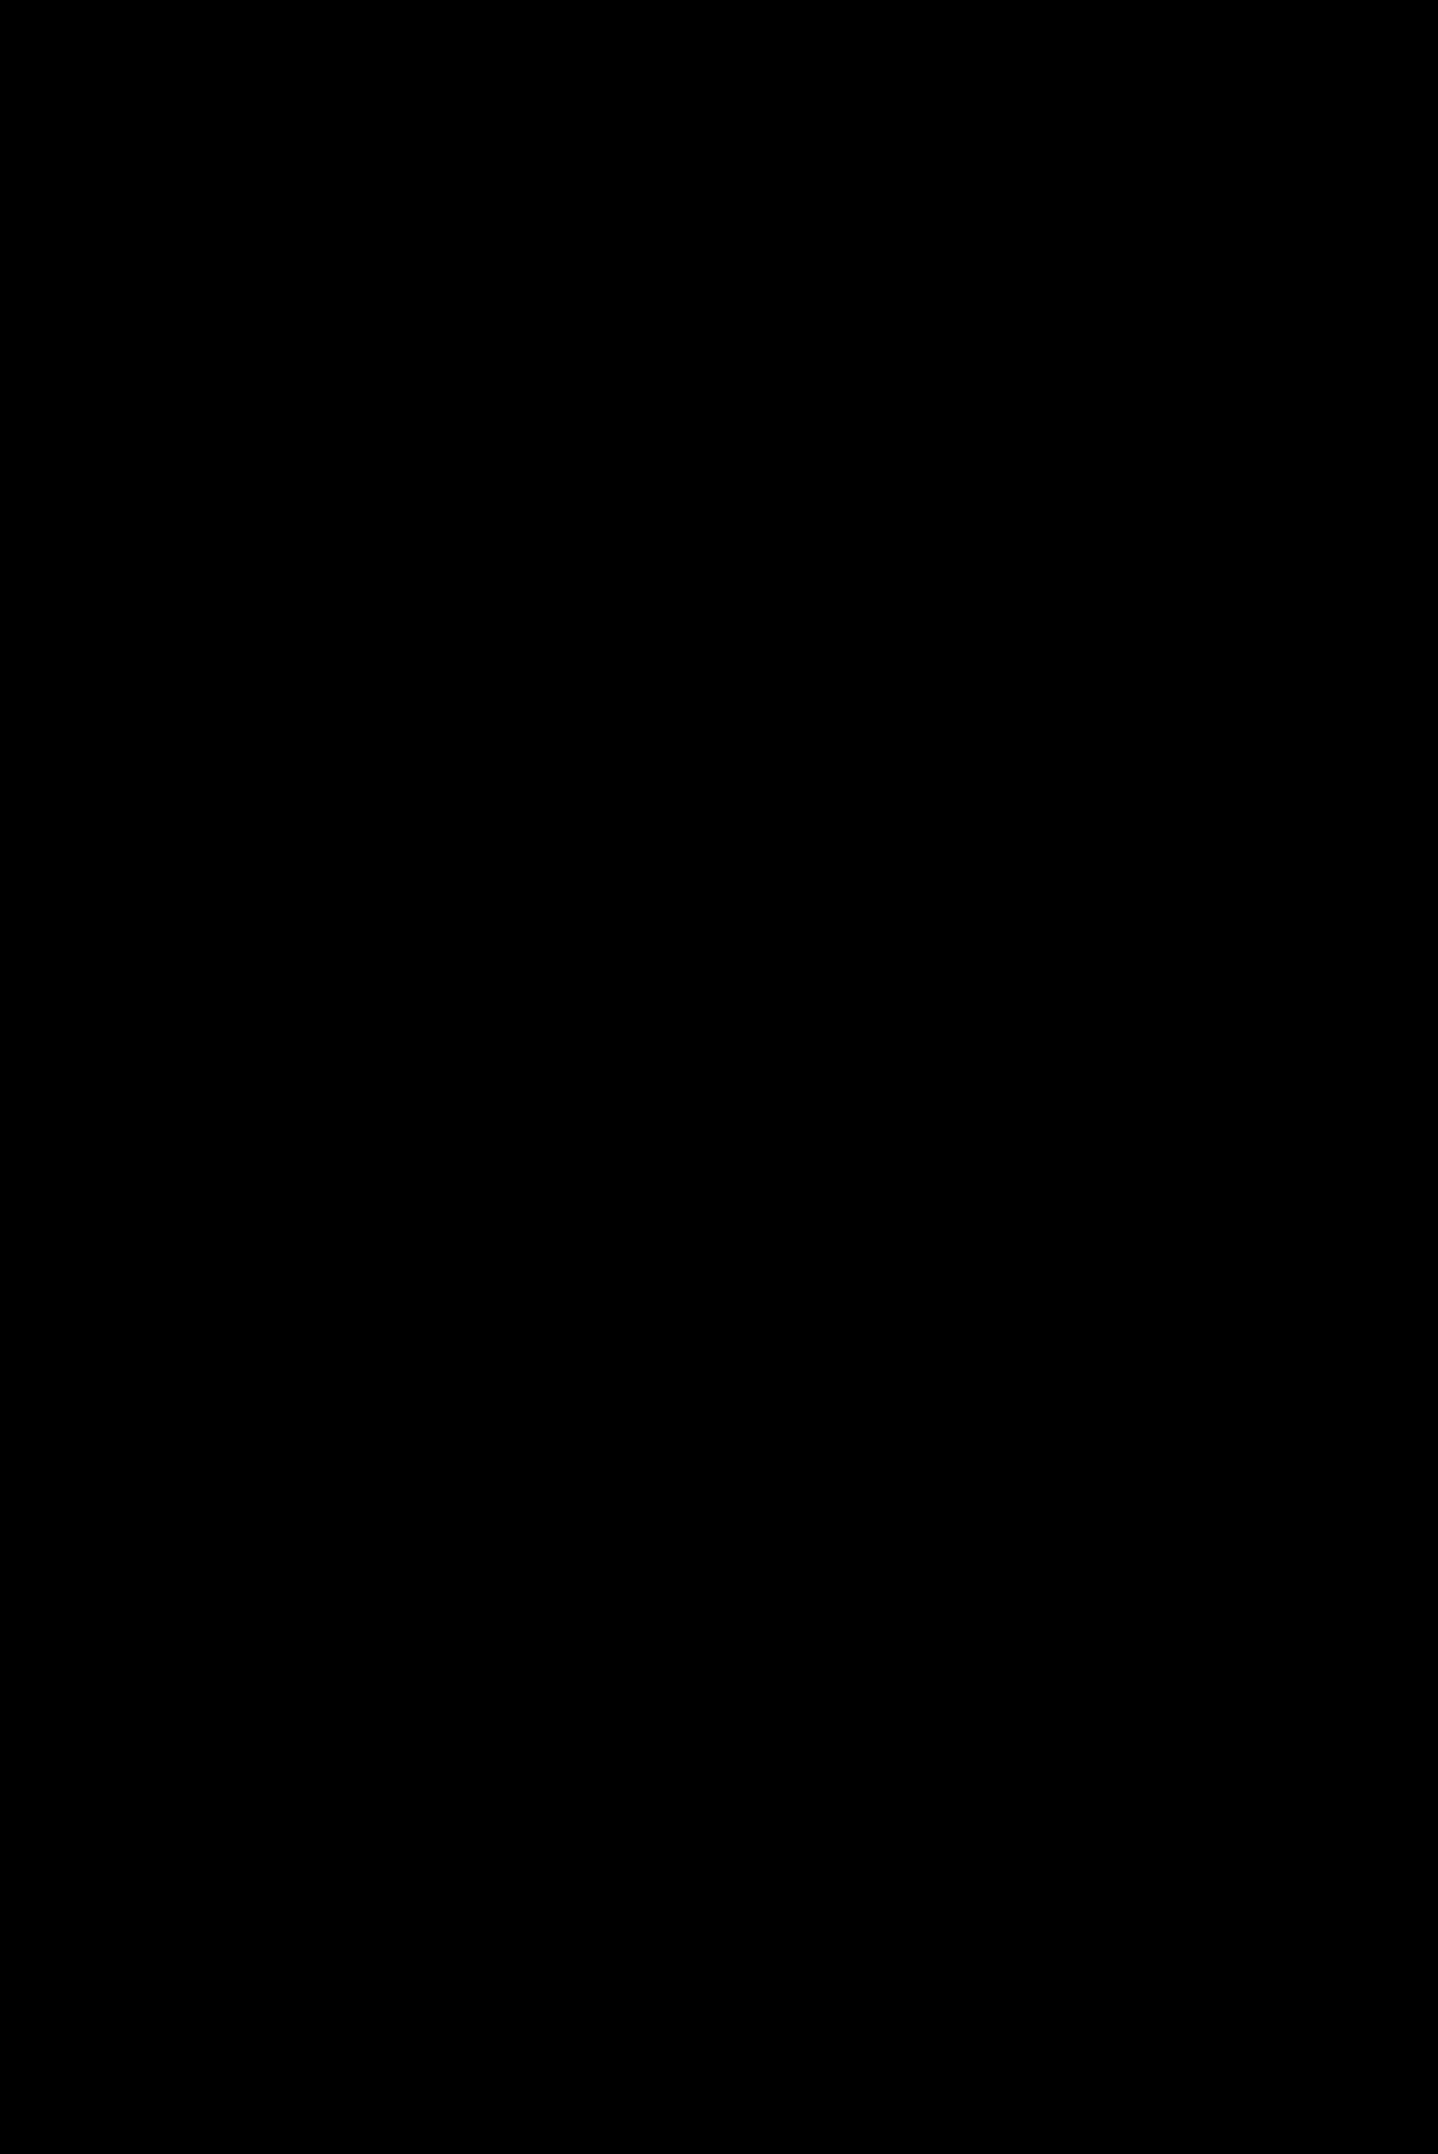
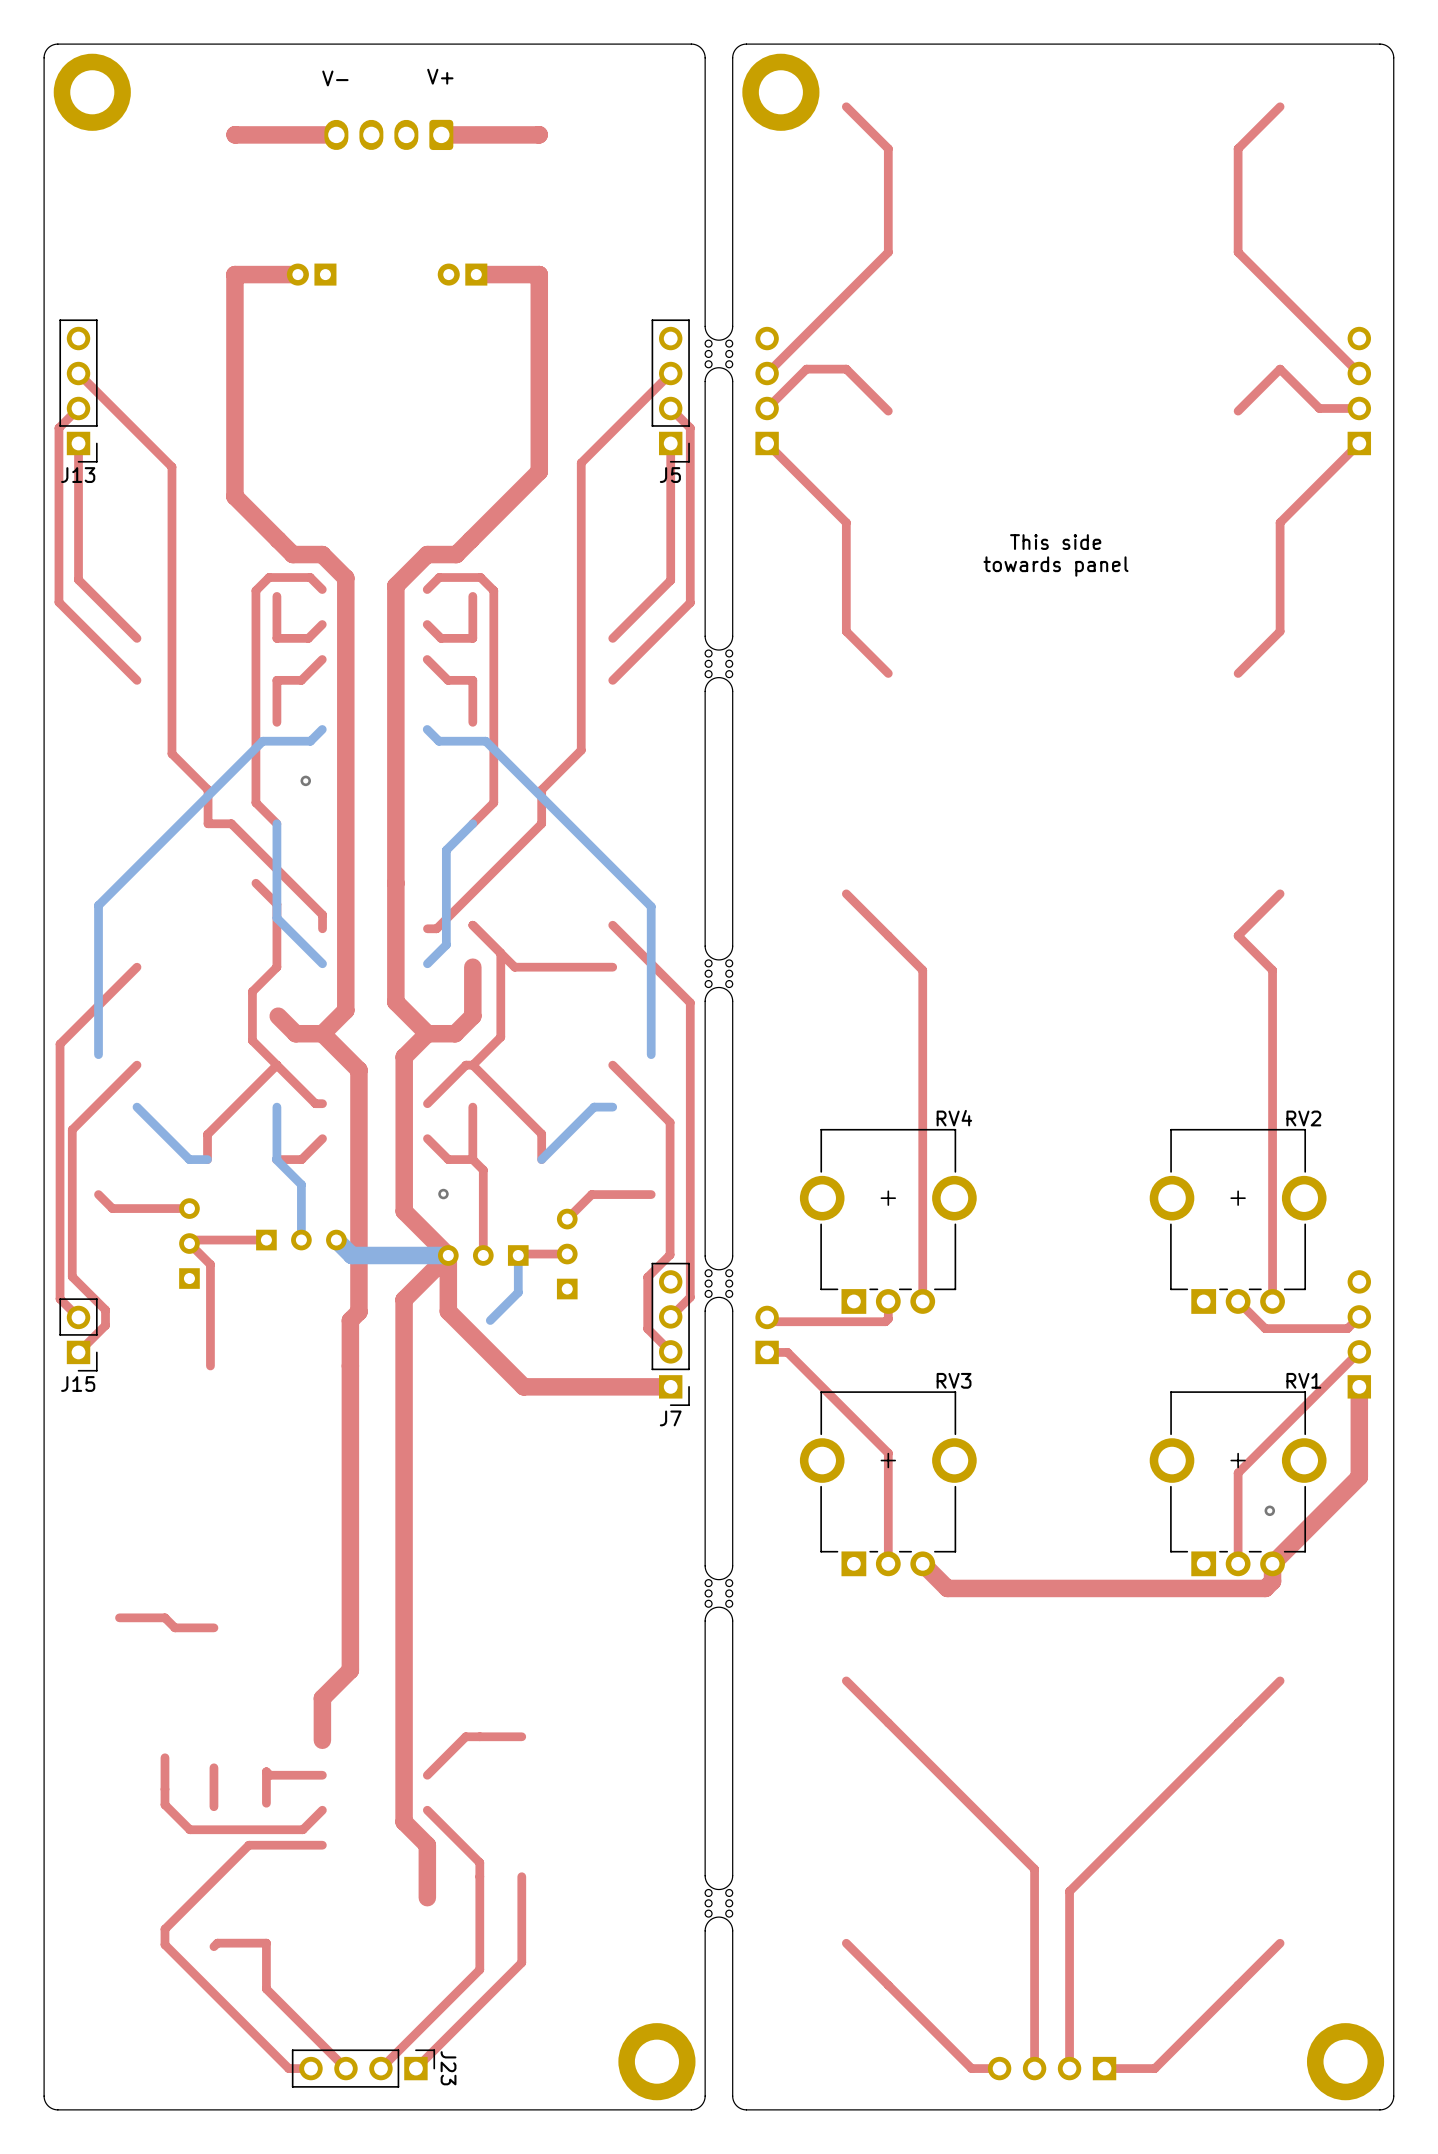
board edge: none -> (1379, 44) (740, 45) (734, 50) (732, 57) (732, 328) (728, 336) (718, 340) (709, 336) (705, 328) (705, 57) (703, 50) (697, 45) (57, 44) (51, 45) (46, 50) (44, 57) (44, 2096) (46, 2103) (50, 2107) (57, 2109) (694, 2109) (702, 2104) (705, 2097) (705, 1929) (710, 1919) (718, 1917) (727, 1919) (732, 1929) (732, 2097) (735, 2104) (743, 2109) (1379, 2109) (1385, 2108) (1391, 2103) (1393, 2096) (1393, 57) (1389, 48) (1379, 44)
part: none -> (92, 92)
part: none -> (780, 92)
top track: none -> (846, 106) (888, 148) (888, 252) (767, 373)
top track: none -> (1280, 106) (1238, 148) (1238, 252) (1359, 373)
top track: none -> (234, 134) (336, 134)
part: none -> (388, 134)
top track: none -> (539, 134) (441, 134)
top track: none -> (297, 274) (234, 274) (234, 496) (292, 554) (322, 554) (345, 578) (345, 1010) (322, 1033)
part: none -> (311, 274)
part: none -> (462, 274)
top track: none -> (476, 274) (539, 274) (539, 471) (456, 554) (427, 554) (395, 585) (395, 1002) (427, 1033)
part: none -> (718, 353)
top track: none -> (78, 373) (171, 466) (171, 753) (208, 789) (208, 823) (231, 823) (322, 914) (322, 928)
top track: none -> (670, 373) (581, 462) (581, 750) (541, 789) (541, 823) (436, 928) (427, 928)
board edge: none -> (732, 381) (732, 636) (728, 646) (718, 650) (709, 646) (705, 636) (705, 381) (709, 371) (718, 367) (728, 371) (732, 381)
J13: none -> (78, 391)
J5: none -> (670, 391)
part: none -> (767, 391)
part: none -> (1359, 391)
top track: none -> (78, 408) (58, 428) (58, 602) (136, 680)
top track: none -> (670, 408) (690, 428) (690, 602) (612, 680)
top track: none -> (767, 408) (806, 369) (846, 369) (888, 411)
top track: none -> (1359, 408) (1319, 408) (1280, 369) (1238, 411)
top track: none -> (78, 443) (78, 579) (136, 638)
top track: none -> (670, 443) (670, 580) (612, 638)
top track: none -> (767, 443) (846, 522) (846, 631) (888, 673)
top track: none -> (1359, 443) (1280, 522) (1280, 631) (1238, 673)
text: none -> This side (1055, 542)
text: none -> towards panel (1056, 566)
top track: none -> (322, 589) (310, 577) (269, 577) (255, 590) (255, 802) (276, 823)
top track: none -> (427, 589) (439, 577) (480, 577) (493, 590) (493, 802) (472, 823)
top track: none -> (276, 596) (276, 638) (308, 638) (322, 624)
top track: none -> (472, 596) (472, 638) (441, 638) (427, 624)
top track: none -> (322, 659) (301, 680) (276, 680) (276, 722)
top track: none -> (427, 659) (448, 680) (472, 680) (472, 722)
part: none -> (718, 663)
board edge: none -> (732, 691) (732, 946) (728, 955) (718, 959) (709, 955) (705, 946) (705, 691) (709, 681) (718, 677) (728, 681) (732, 691)
bottom track: none -> (322, 729) (310, 741) (262, 741) (98, 905) (98, 1054)
bottom track: none -> (427, 729) (438, 741) (485, 741) (651, 906) (651, 1054)
via: none -> (305, 780)
bottom track: none -> (276, 823) (276, 918) (322, 963)
bottom track: none -> (472, 823) (446, 850) (446, 944) (427, 963)
top track: none -> (255, 883) (276, 904) (276, 967) (252, 991) (252, 1040) (315, 1103) (322, 1103)
top track: none -> (846, 893) (922, 970) (922, 1301)
top track: none -> (1280, 893) (1238, 935) (1272, 970) (1272, 1301)
top track: none -> (472, 925) (514, 967) (612, 967)
top track: none -> (612, 925) (690, 1002) (690, 1297) (670, 1316)
top track: none -> (500, 953) (500, 1037) (472, 1065)
top track: none -> (136, 967) (60, 1044) (60, 1298) (78, 1317)
top track: none -> (472, 967) (472, 1016) (455, 1033) (427, 1033)
part: none -> (718, 973)
board edge: none -> (732, 1001) (732, 1256) (728, 1265) (718, 1269) (709, 1265) (705, 1256) (705, 1001) (709, 991) (718, 987) (728, 991) (732, 1001)
top track: none -> (278, 1016) (295, 1033) (322, 1033)
top track: none -> (322, 1033) (358, 1070) (358, 1311) (350, 1320) (350, 1670) (322, 1698) (322, 1740)
top track: none -> (427, 1033) (404, 1056) (404, 1211) (448, 1255)
top track: none -> (136, 1065) (72, 1129) (72, 1276) (105, 1310) (105, 1325) (78, 1352)
top track: none -> (276, 1065) (207, 1134) (207, 1159)
top track: none -> (472, 1065) (466, 1065) (427, 1103)
top track: none -> (472, 1065) (541, 1134) (541, 1159)
top track: none -> (612, 1065) (670, 1122) (670, 1254) (647, 1277) (647, 1328) (670, 1351)
bottom track: none -> (136, 1107) (189, 1159) (207, 1159)
bottom track: none -> (276, 1107) (276, 1159)
top track: none -> (472, 1107) (472, 1159)
bottom track: none -> (612, 1107) (594, 1107) (541, 1159)
top track: none -> (322, 1138) (301, 1159) (276, 1159)
top track: none -> (427, 1138) (448, 1159) (472, 1159)
bottom track: none -> (276, 1159) (301, 1184) (301, 1240)
top track: none -> (472, 1159) (483, 1170) (483, 1255)
top track: none -> (98, 1194) (112, 1208) (189, 1208)
via: none -> (443, 1194)
top track: none -> (651, 1194) (591, 1194) (567, 1219)
RV4: none -> (888, 1221)
RV2: none -> (1238, 1221)
top track: none -> (266, 1240) (192, 1240) (189, 1243) (210, 1264) (210, 1365)
part: none -> (301, 1240)
bottom track: none -> (336, 1240) (351, 1255) (448, 1255)
part: none -> (189, 1243)
top track: none -> (567, 1254) (518, 1255)
part: none -> (567, 1254)
top track: none -> (448, 1255) (448, 1311) (523, 1386) (670, 1386)
top track: none -> (448, 1255) (404, 1299) (404, 1821) (427, 1845) (427, 1897)
part: none -> (483, 1255)
bottom track: none -> (518, 1255) (518, 1292) (490, 1320)
part: none -> (718, 1283)
top track: none -> (888, 1301) (888, 1319) (885, 1321) (771, 1321) (767, 1317)
top track: none -> (1238, 1301) (1265, 1328) (1347, 1328) (1359, 1316)
board edge: none -> (732, 1311) (732, 1565) (728, 1575) (718, 1579) (709, 1575) (705, 1565) (705, 1311) (709, 1301) (718, 1297) (728, 1301) (732, 1311)
J15: none -> (78, 1334)
J7: none -> (670, 1334)
part: none -> (767, 1334)
part: none -> (1359, 1334)
top track: none -> (1359, 1351) (1238, 1473) (1238, 1563)
top track: none -> (767, 1352) (787, 1352) (888, 1453) (888, 1563)
top track: none -> (1359, 1386) (1359, 1477) (1272, 1563) (1272, 1581) (1265, 1588) (947, 1588) (922, 1563)
RV3: none -> (888, 1483)
RV1: none -> (1238, 1483)
via: none -> (1269, 1510)
part: none -> (718, 1593)
top track: none -> (119, 1617) (164, 1617) (175, 1627) (213, 1627)
board edge: none -> (732, 1620) (732, 1875) (728, 1885) (718, 1889) (709, 1885) (705, 1875) (705, 1620) (709, 1611) (718, 1607) (728, 1611) (732, 1620)
top track: none -> (846, 1680) (1034, 1869) (1034, 2068)
top track: none -> (1280, 1680) (1069, 1891) (1069, 2068)
top track: none -> (521, 1736) (465, 1736) (427, 1775)
top track: none -> (164, 1757) (164, 1804) (189, 1829) (302, 1829) (322, 1810)
top track: none -> (213, 1767) (213, 1806)
top track: none -> (322, 1775) (269, 1775) (266, 1771) (266, 1803)
top track: none -> (427, 1810) (479, 1862) (479, 1969) (380, 2068)
top track: none -> (322, 1845) (248, 1845) (164, 1929) (164, 1944) (288, 2068) (310, 2068)
top track: none -> (521, 1876) (521, 1962) (415, 2068)
part: none -> (718, 1903)
top track: none -> (846, 1943) (971, 2068) (999, 2068)
top track: none -> (1280, 1943) (1154, 2068) (1104, 2068)
top track: none -> (213, 1946) (217, 1943) (266, 1943) (266, 1989) (345, 2068)
part: none -> (656, 2061)
part: none -> (1345, 2061)
J23: none -> (363, 2068)
part: none -> (1052, 2068)

